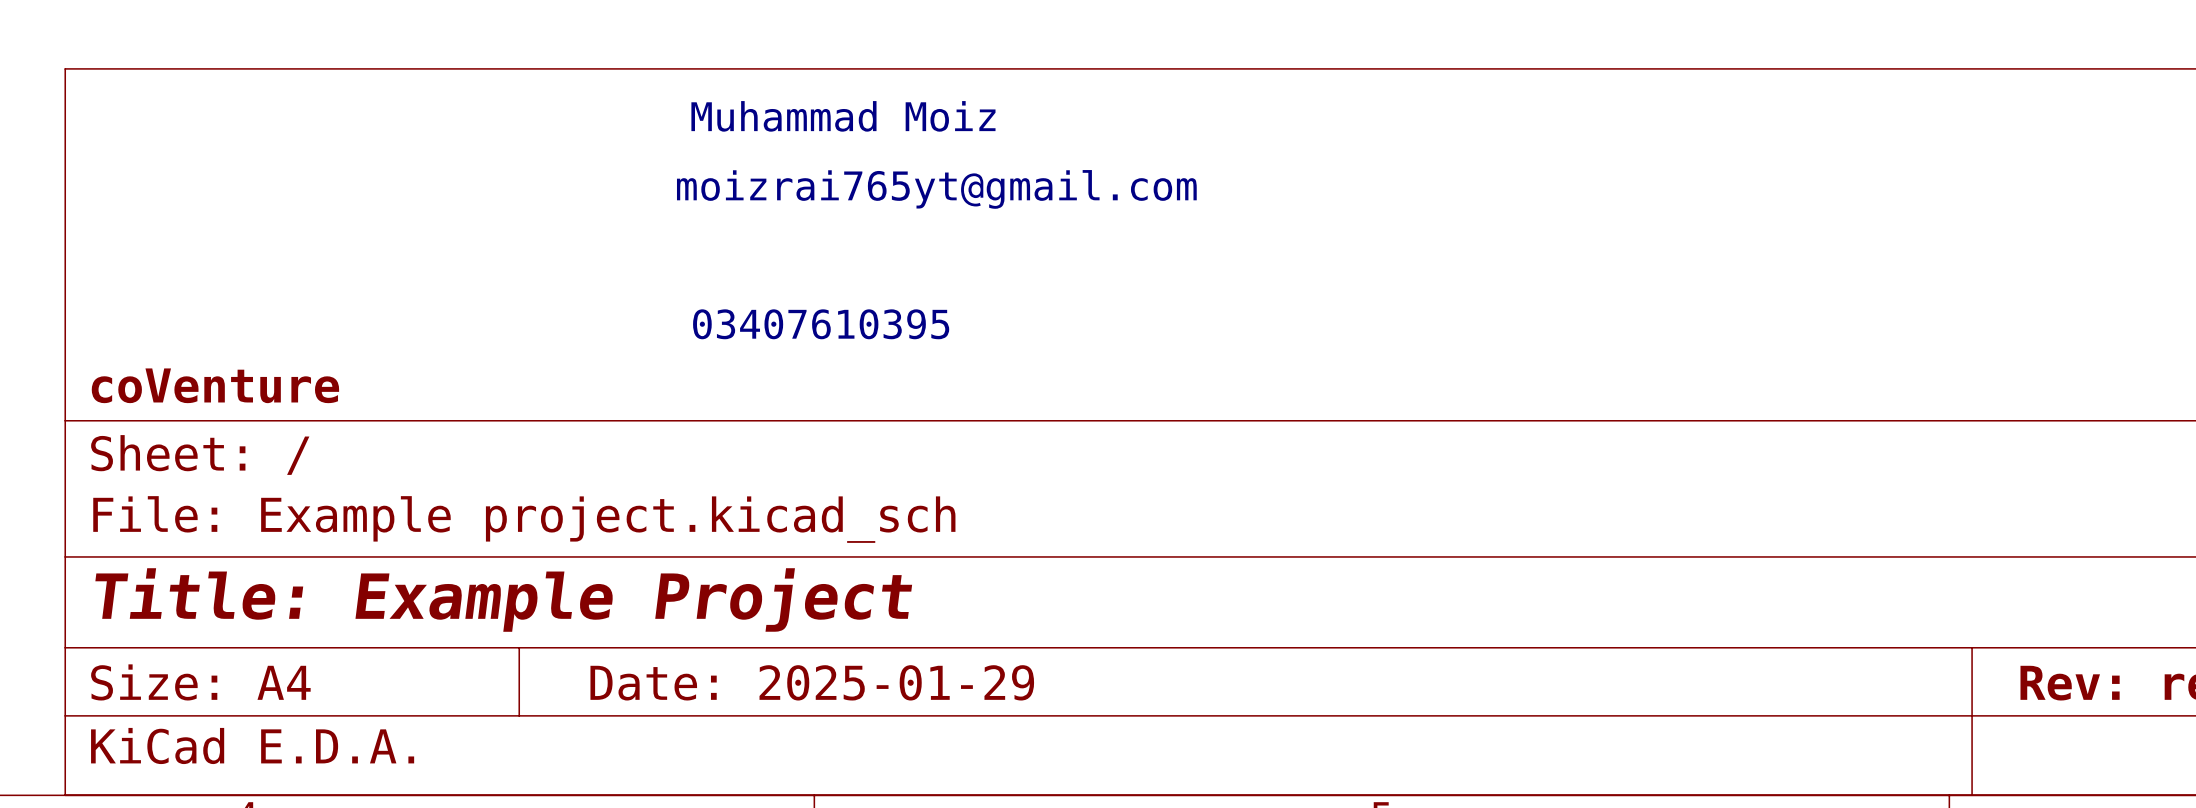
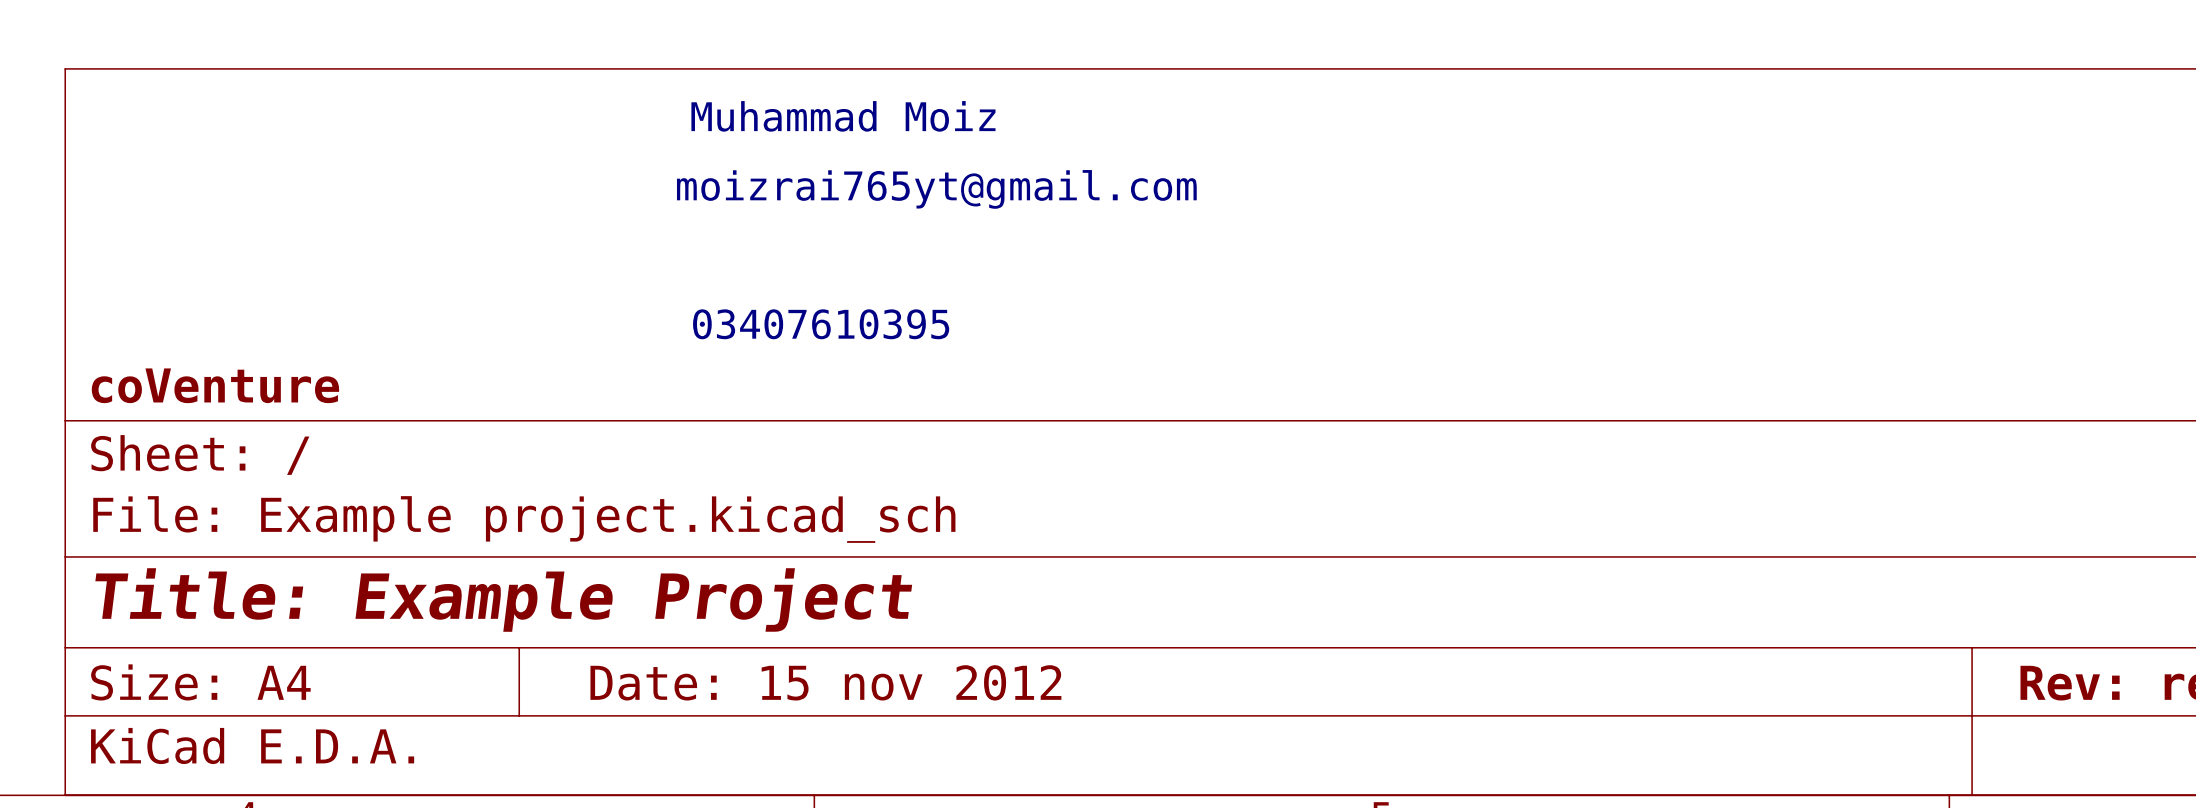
title block: Date: 2025-01-29 (812, 682) -> Date: 15 nov 2012 (825, 682)

